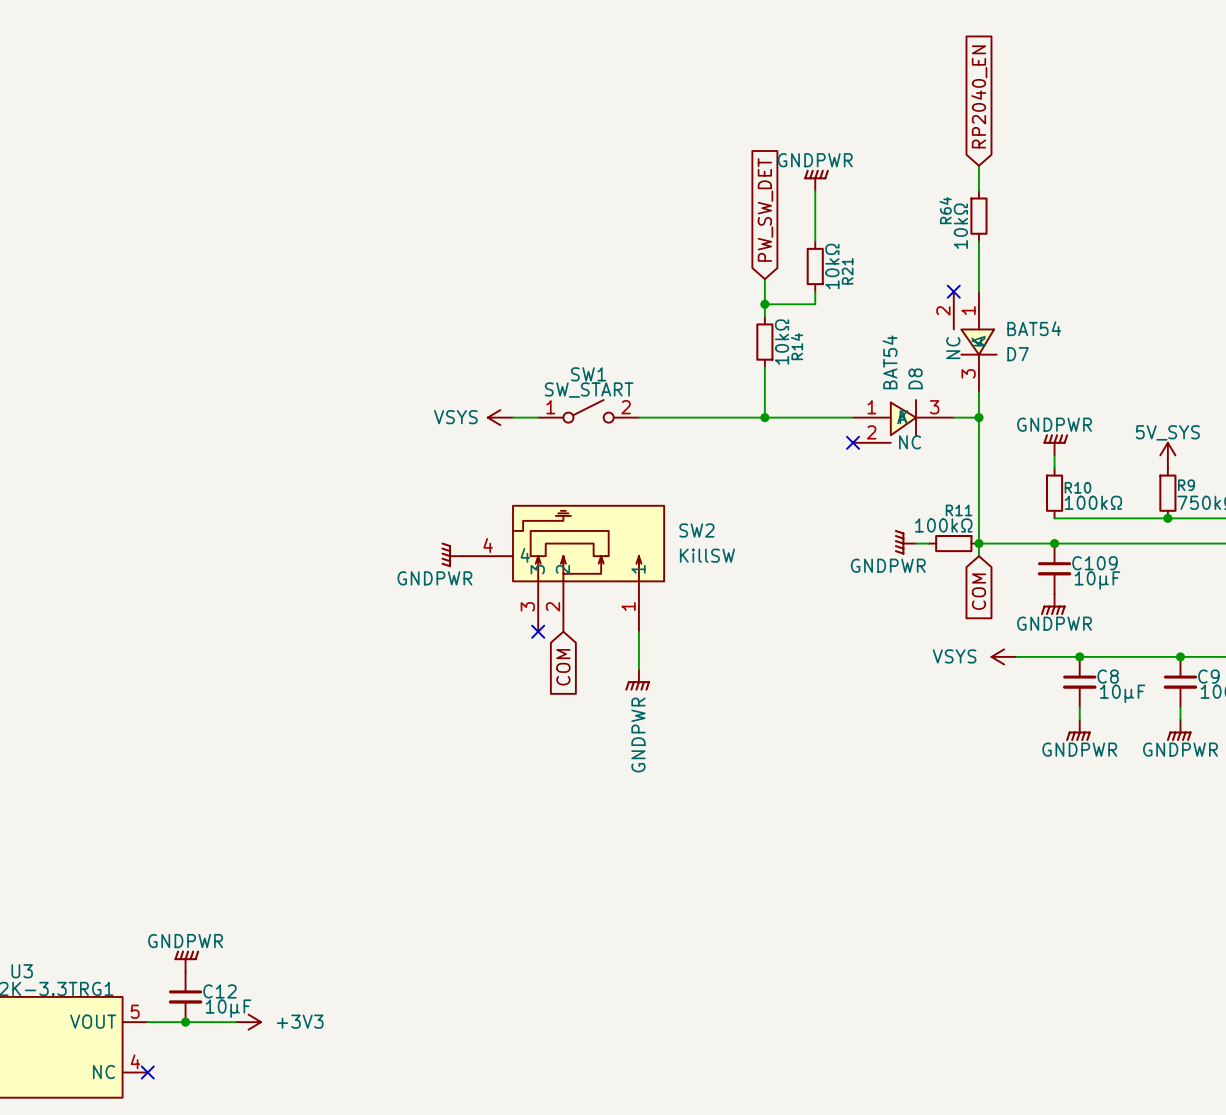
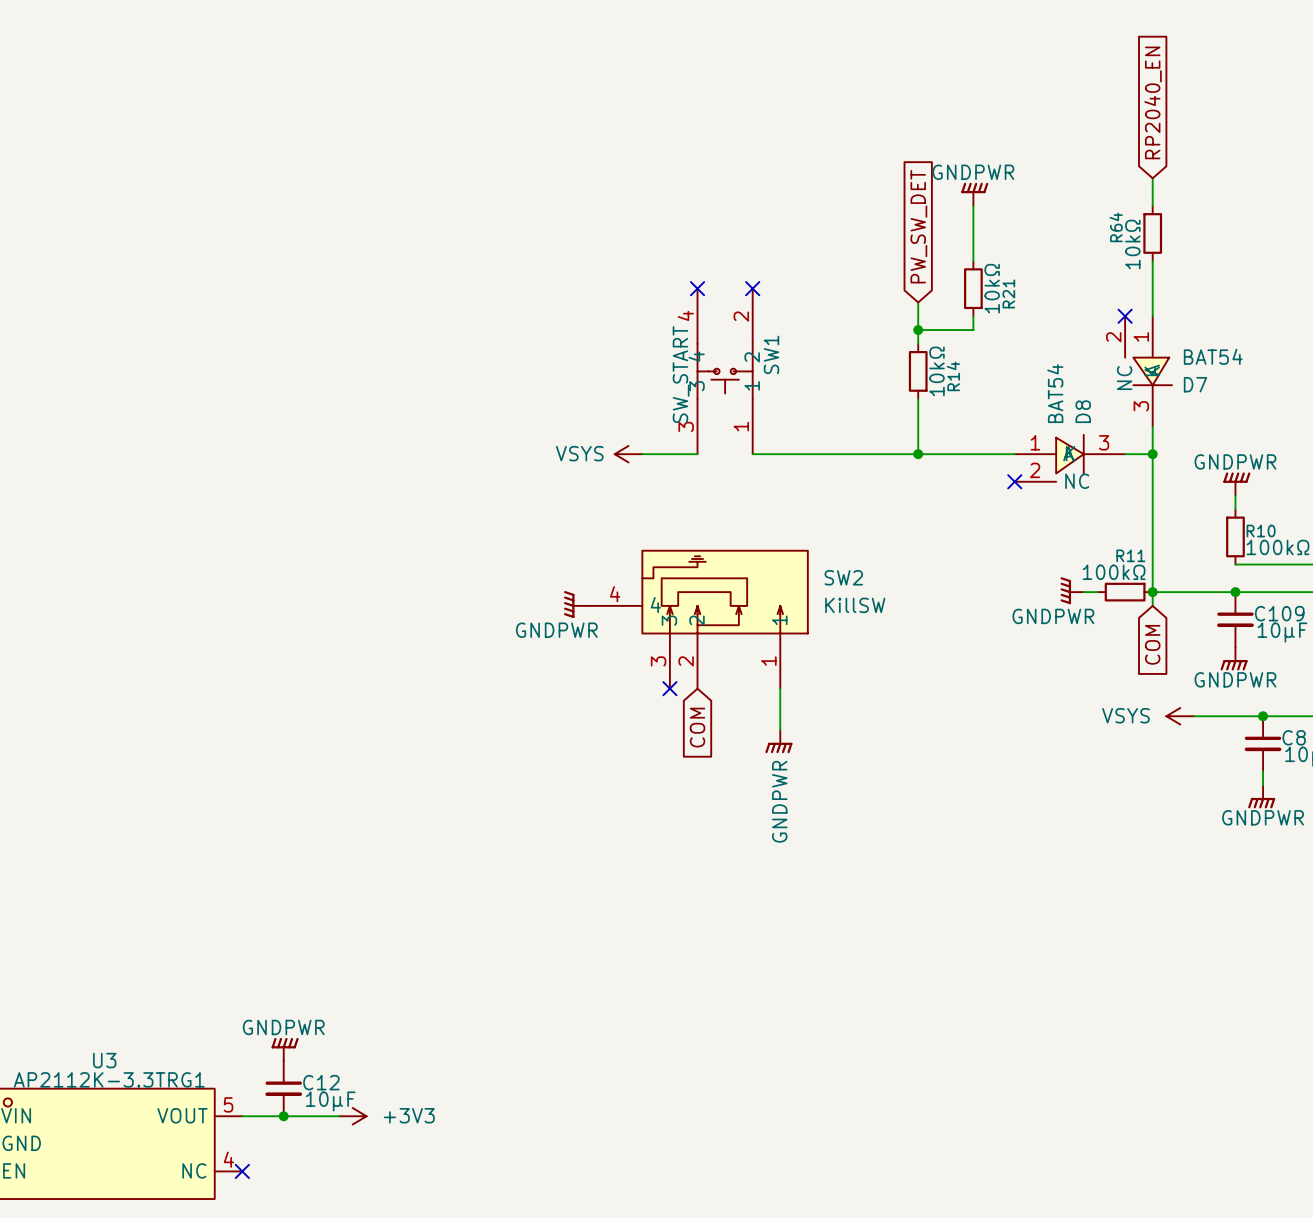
no-connect mark: none -> (697, 288)
no-connect mark: none -> (752, 288)
SW1 name position: SW1 (588, 374) -> SW1 (771, 354)
SW1 value position: SW_START (589, 390) -> SW_START (681, 374)
SW1 symbol: [538, 399, 639, 423] -> [697, 288, 753, 455]

